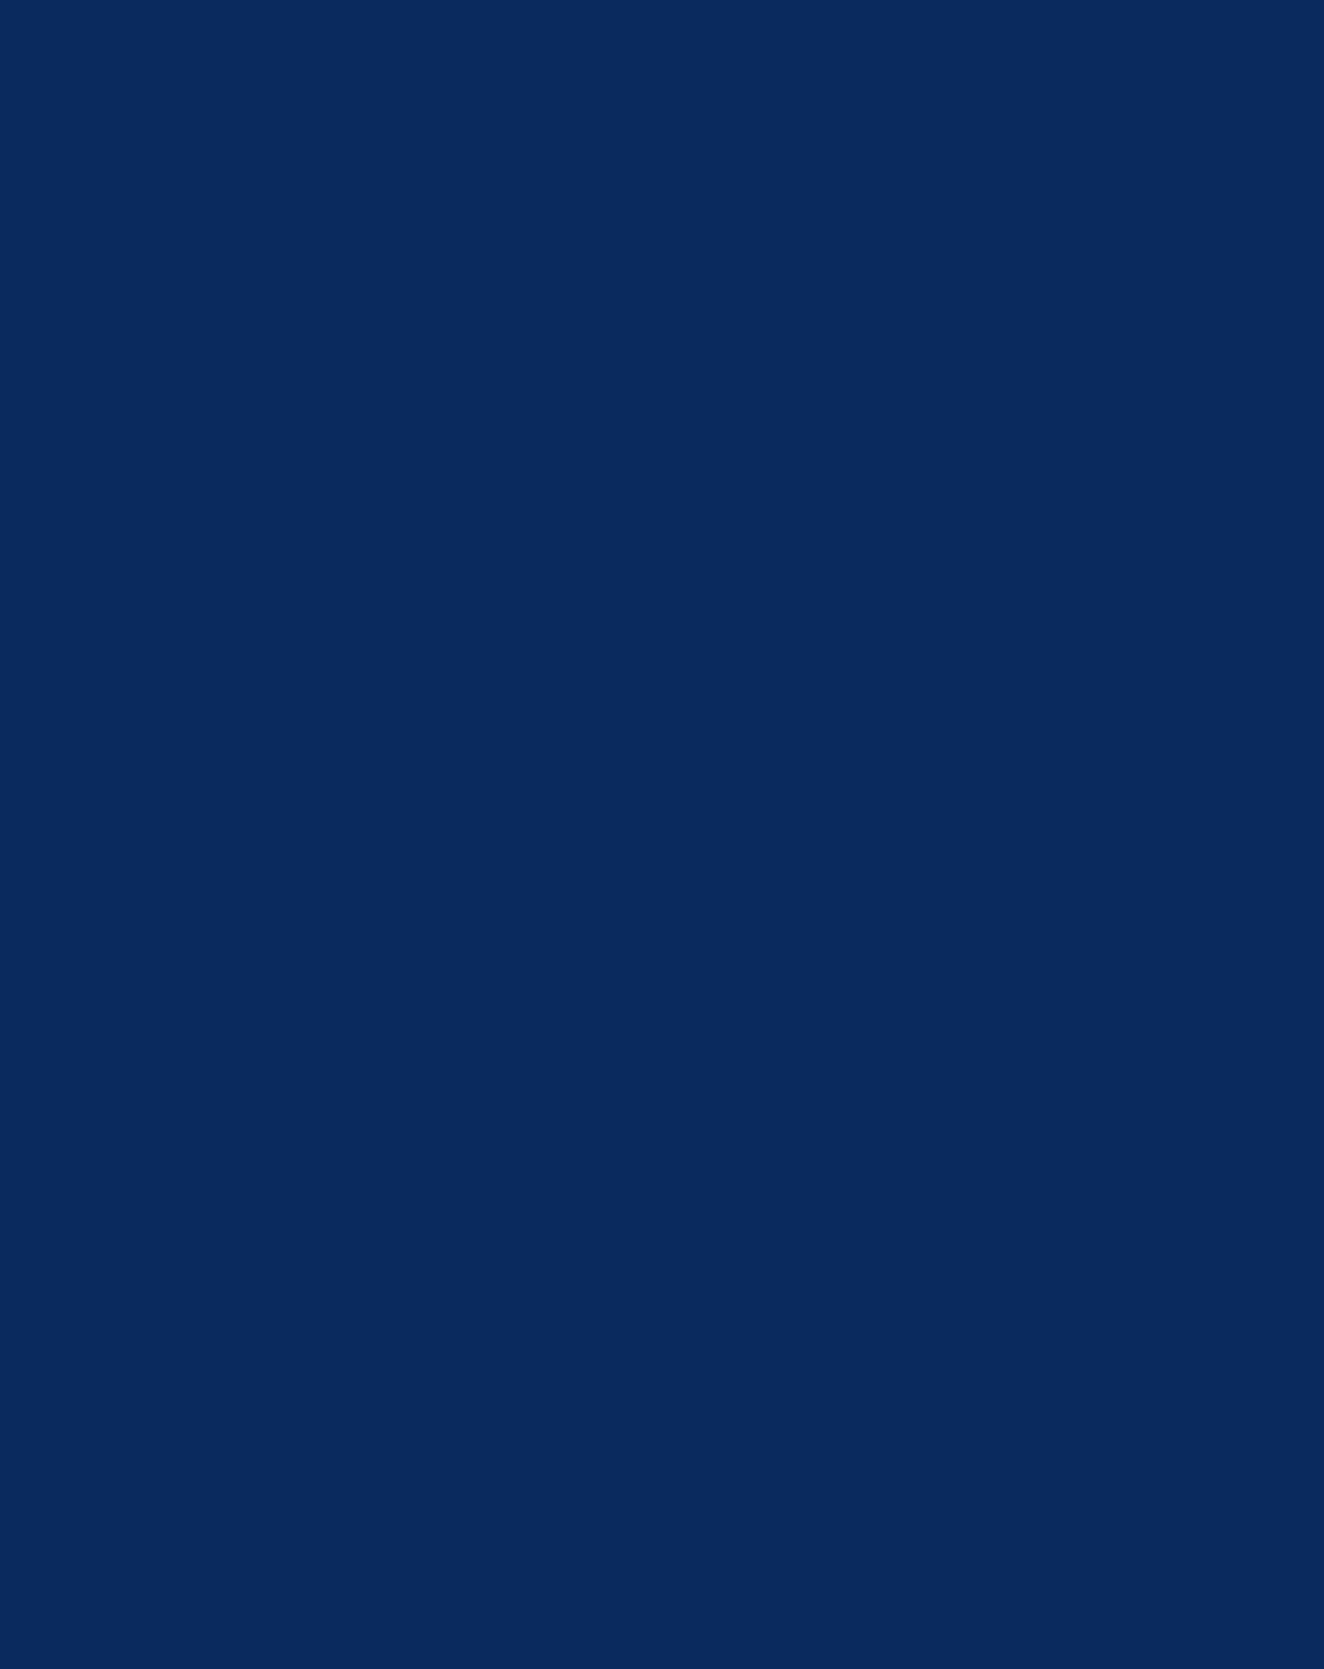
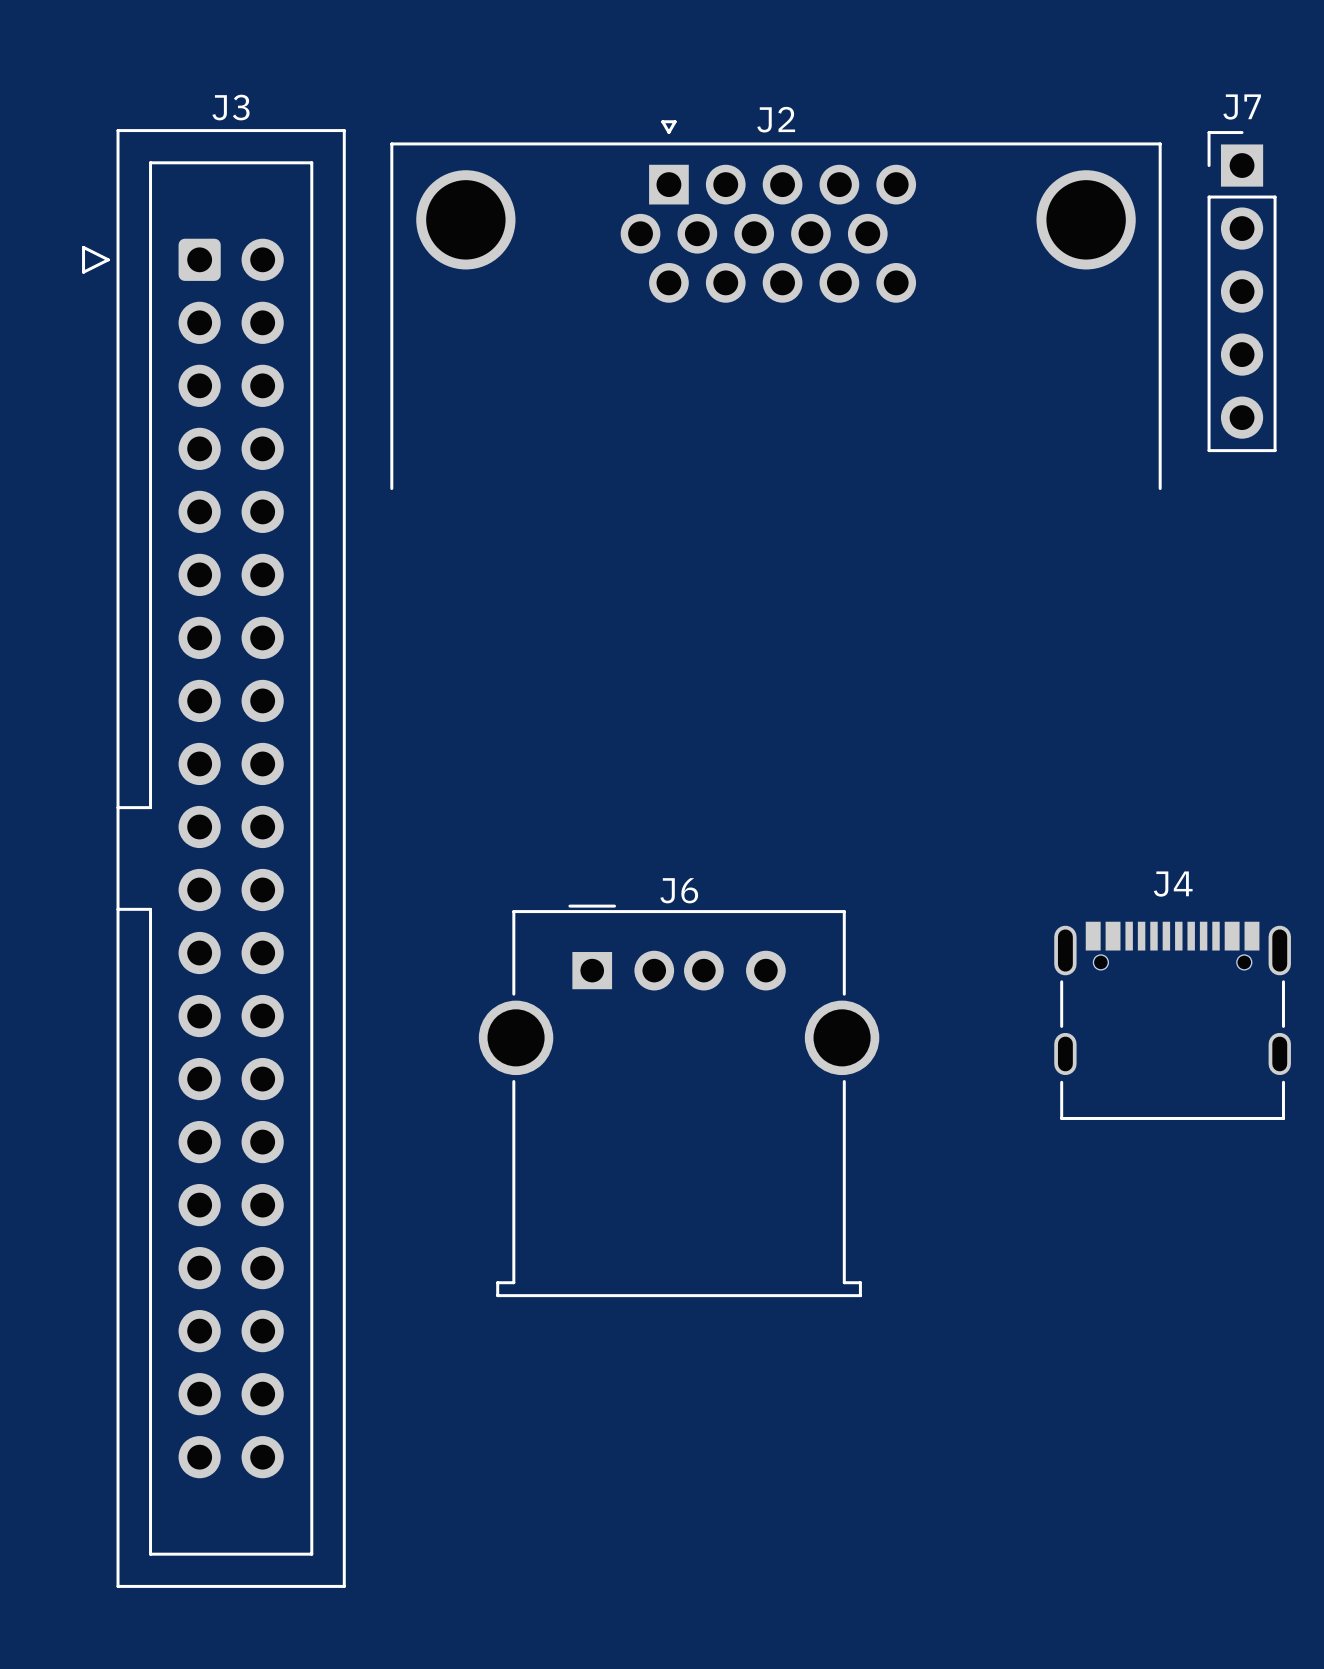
J7: none -> (1242, 291)
J2: none -> (775, 305)
J3: none -> (213, 858)
J4: none -> (1172, 1020)
J6: none -> (679, 1100)

